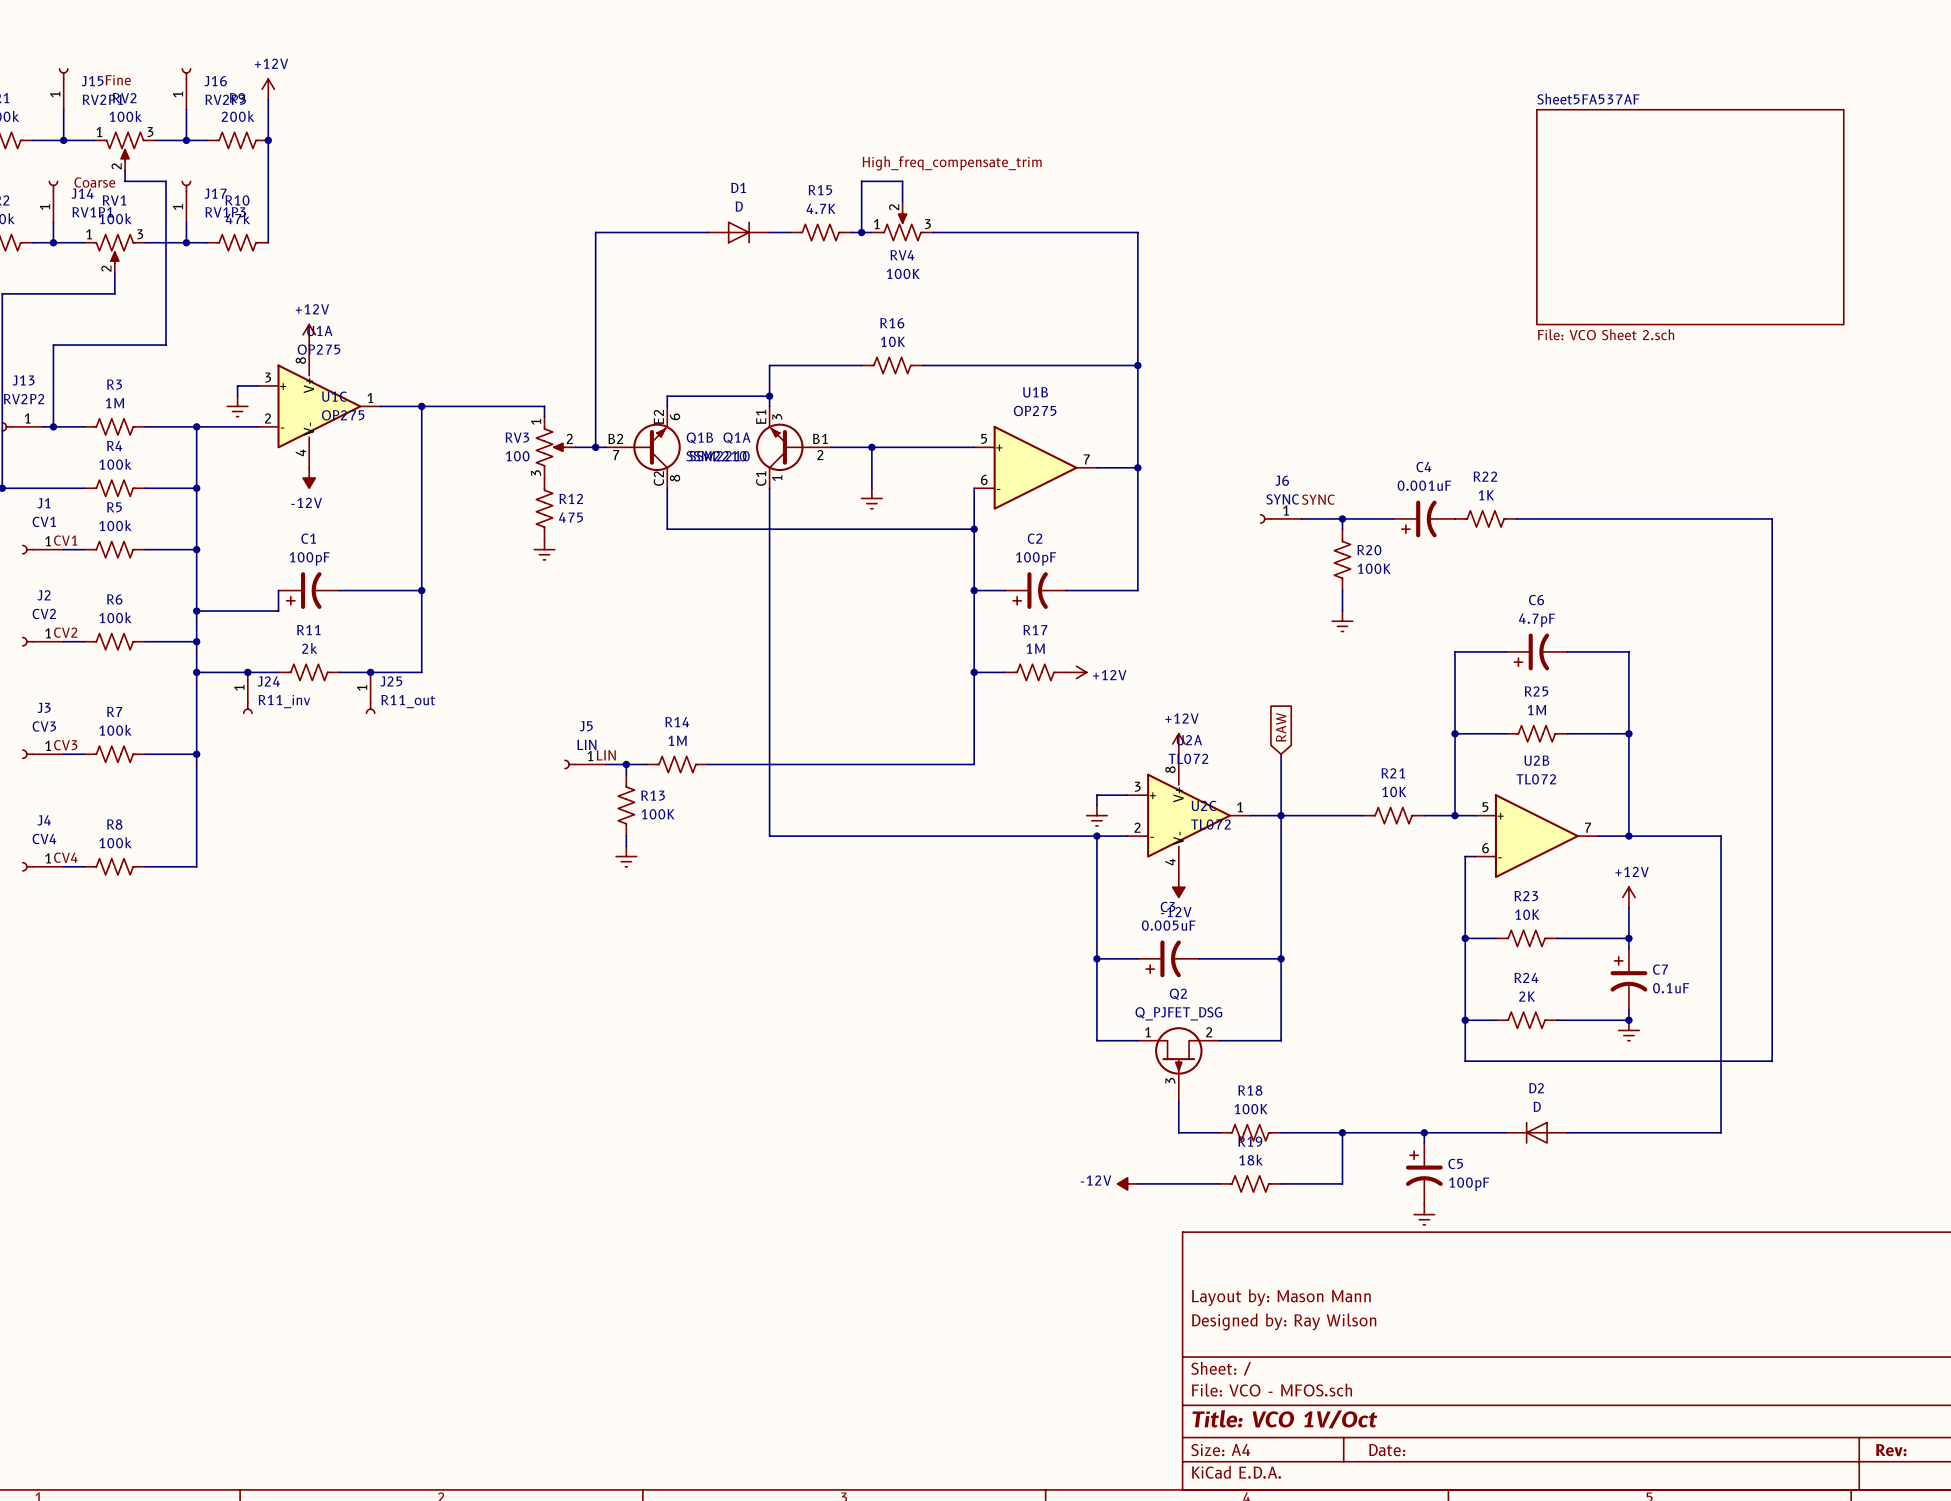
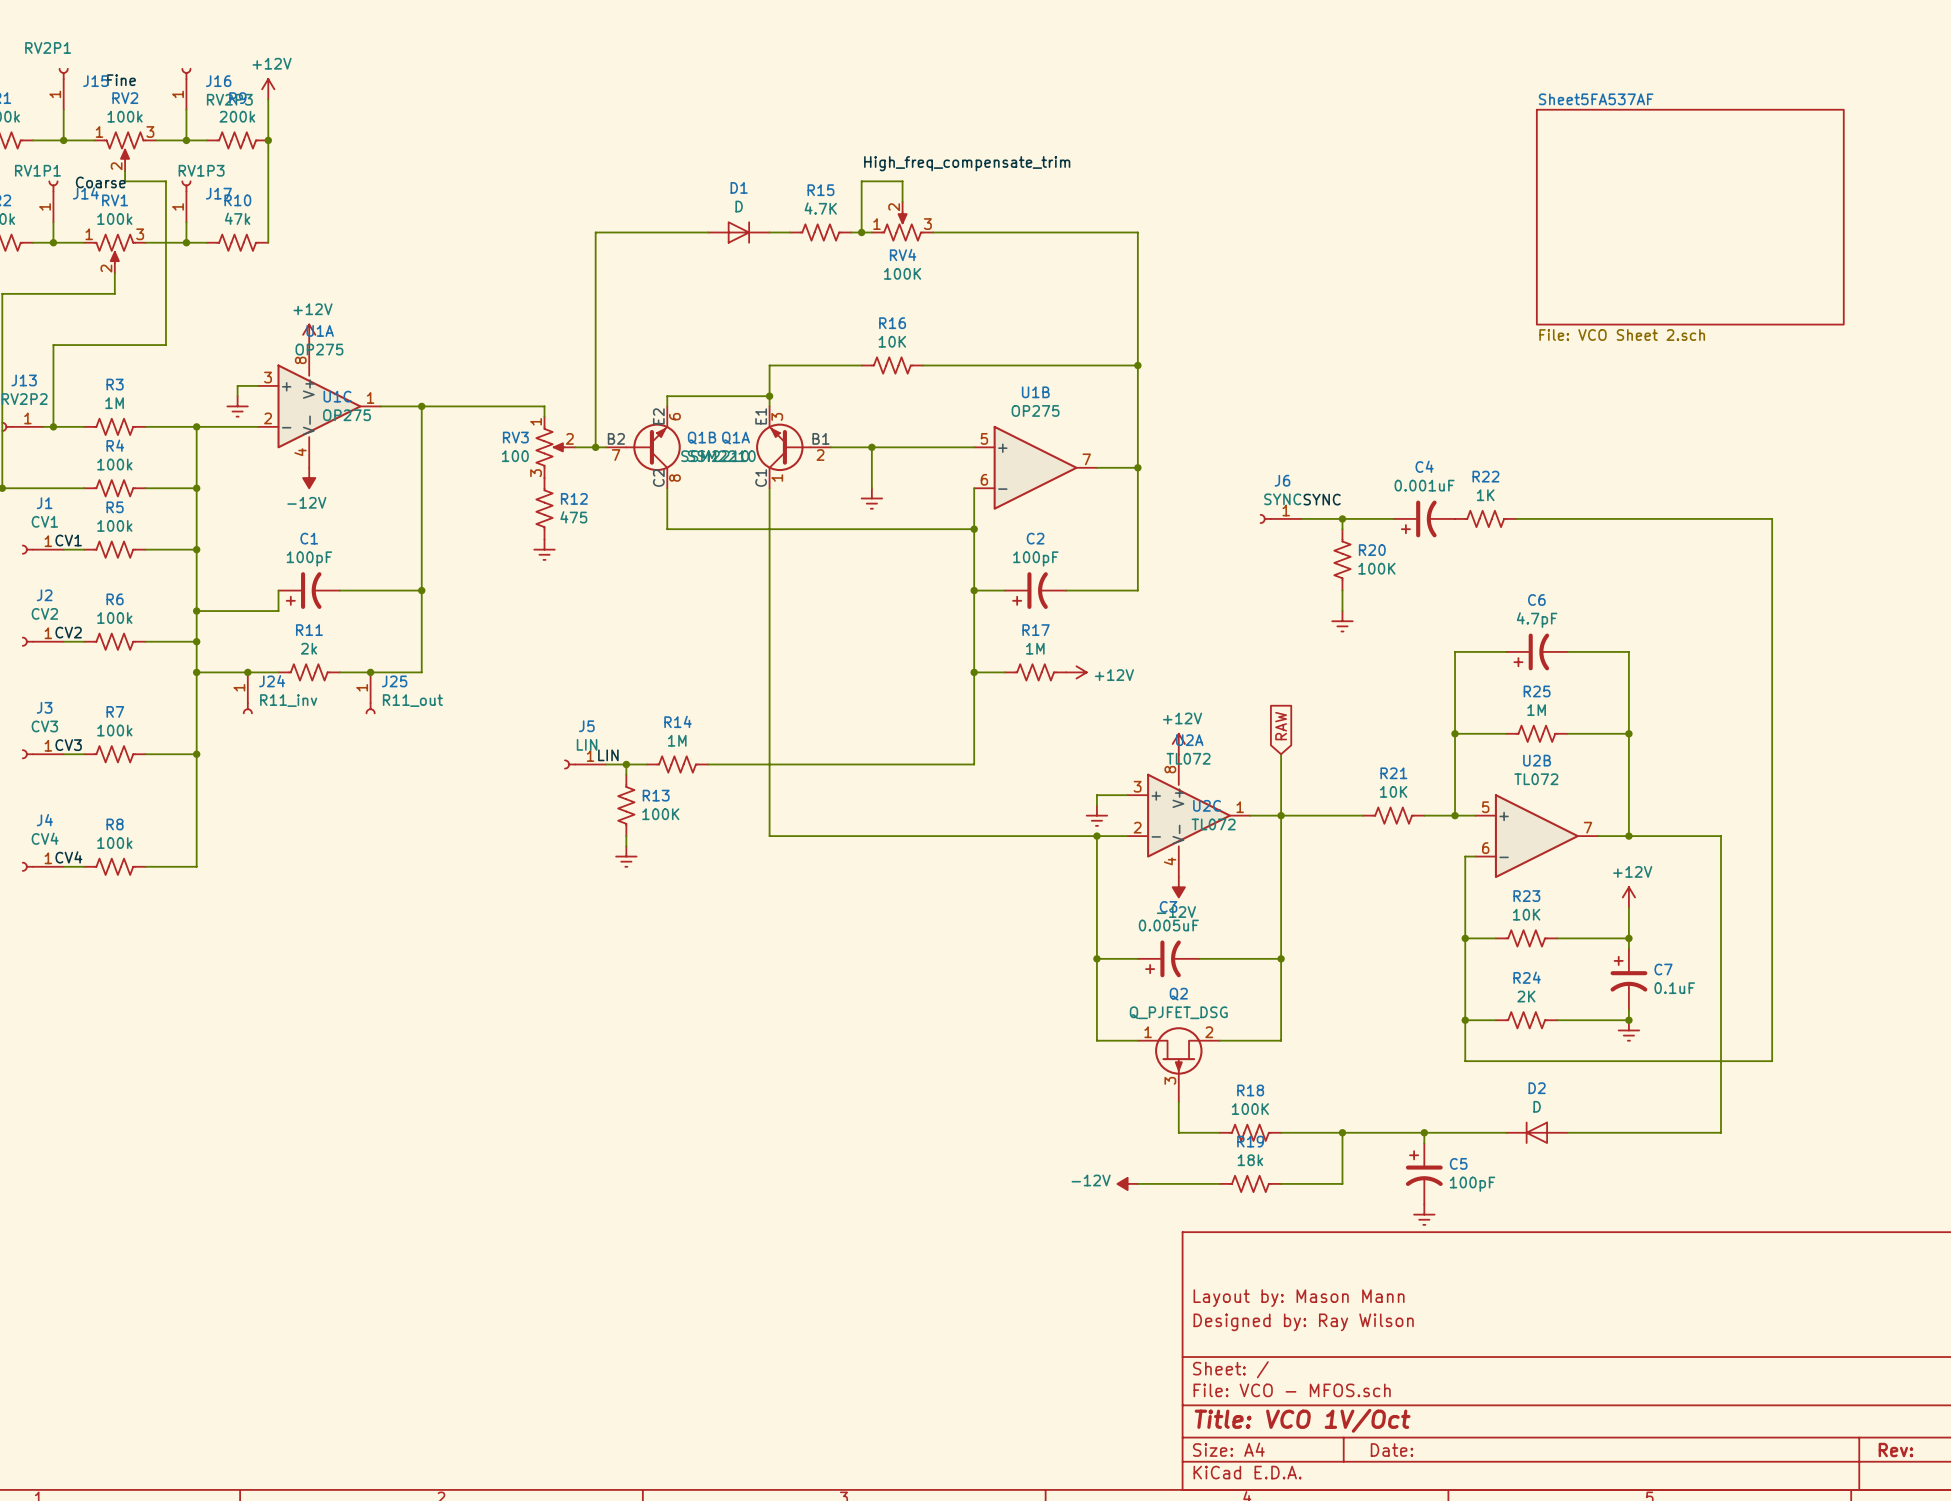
J15 value position: RV2P1 (102, 99) -> RV2P1 (48, 47)
J14 value position: RV1P1 (92, 212) -> RV1P1 (37, 170)
J17 value position: RV1P3 (225, 212) -> RV1P3 (201, 170)

